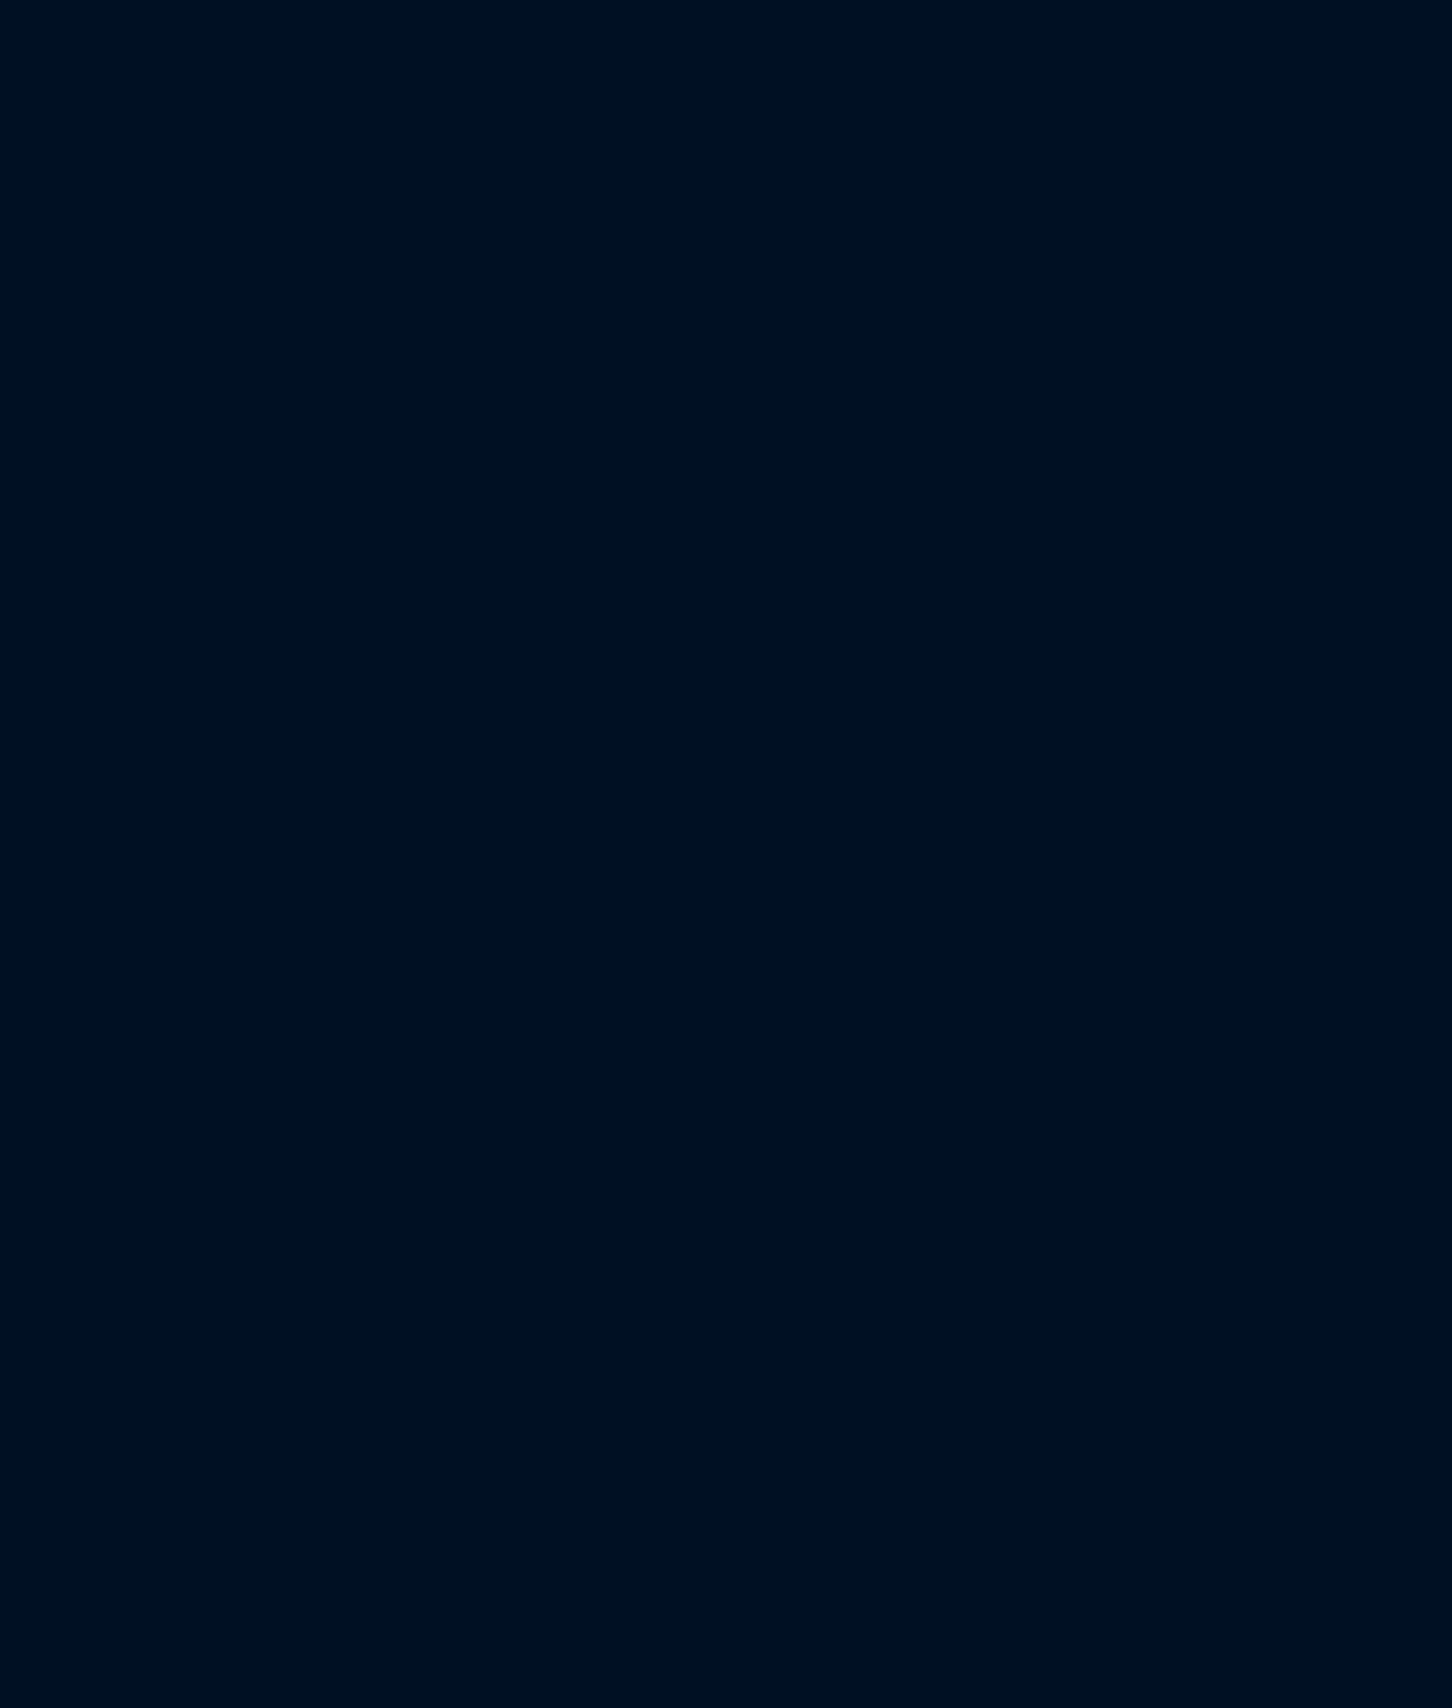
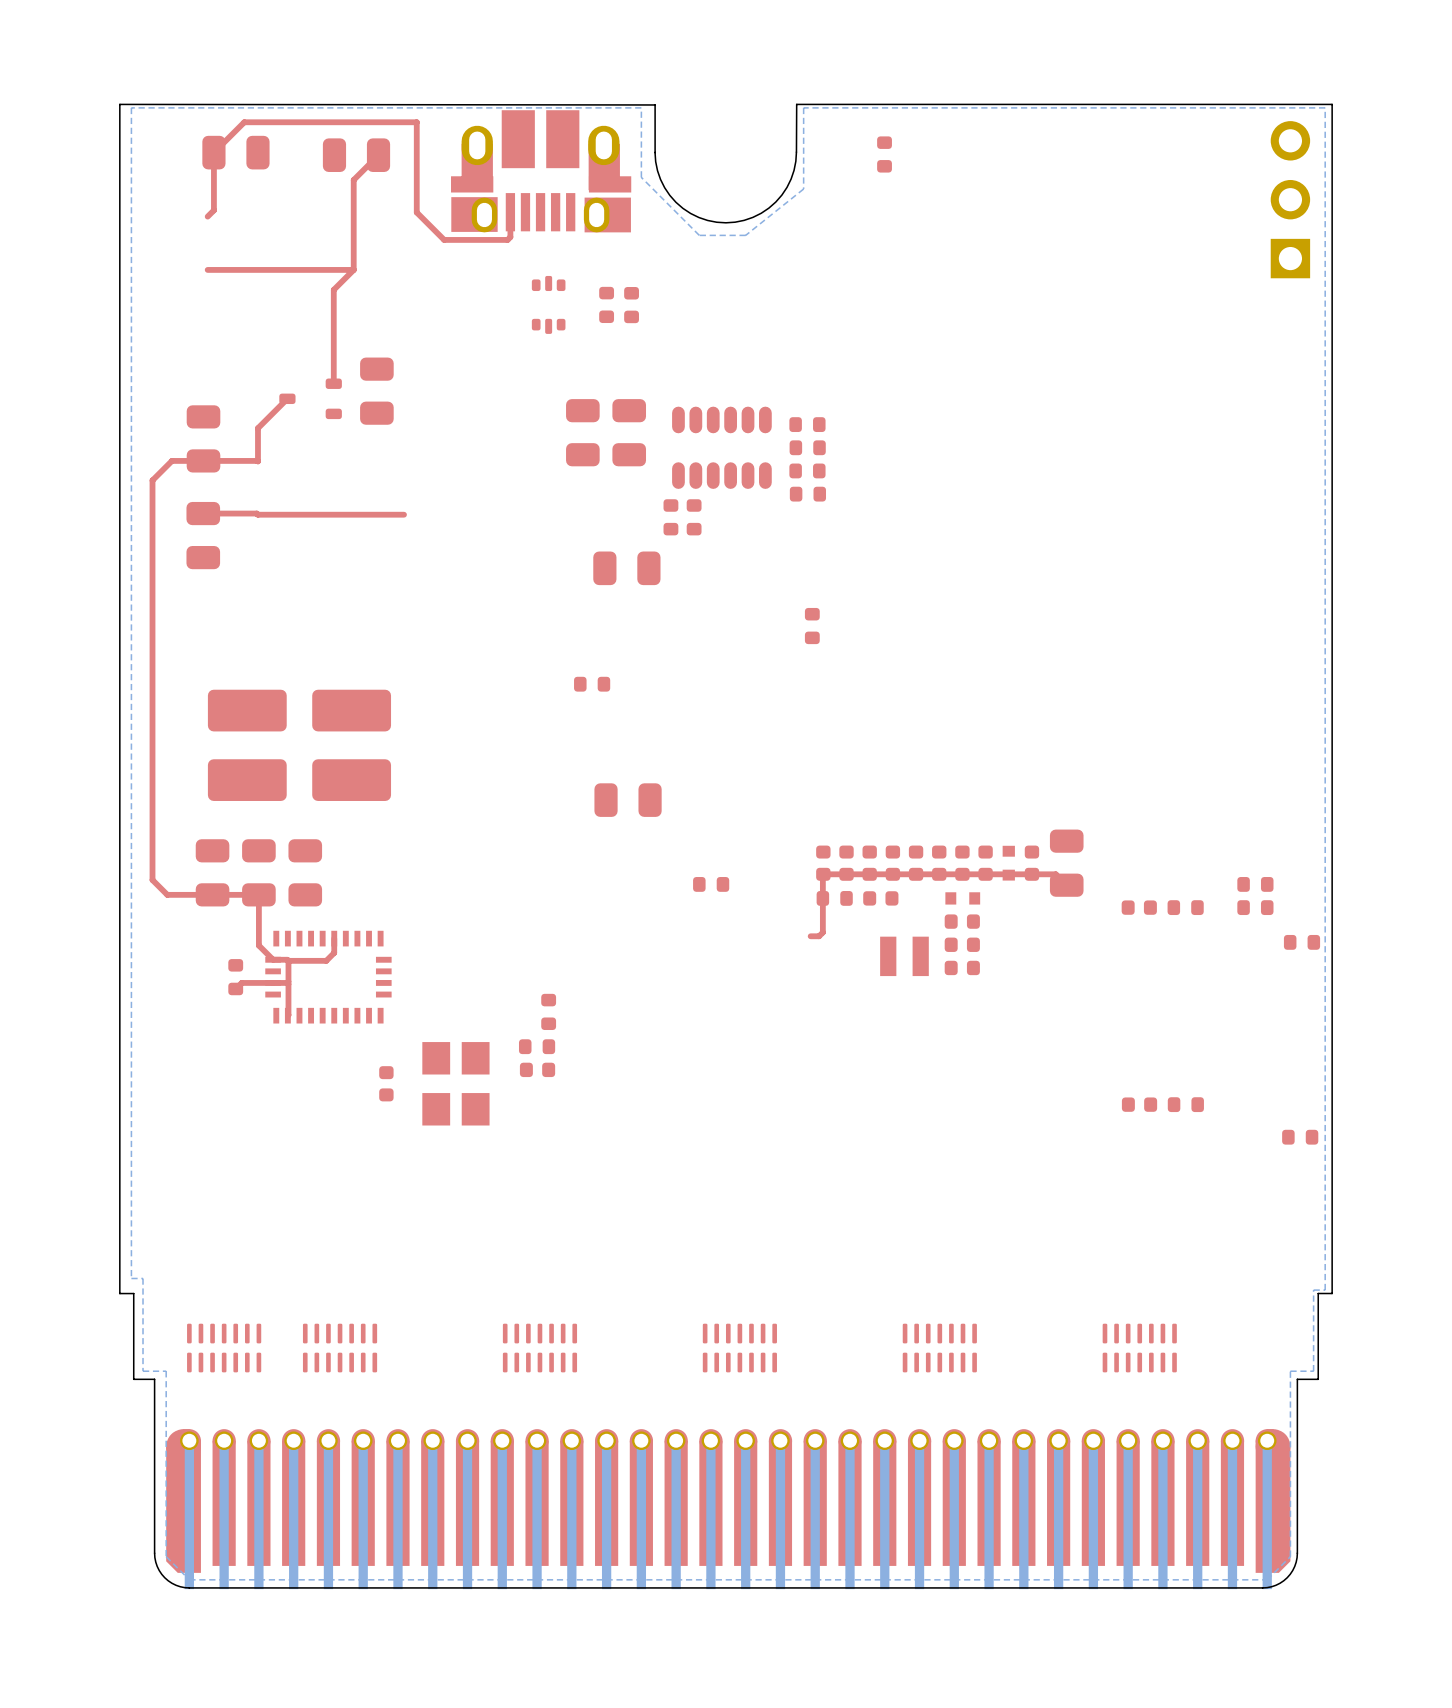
board edge: none -> (1332, 104) (796, 104) (795, 161) (787, 187) (775, 202) (761, 213) (744, 220) (725, 222) (707, 220) (690, 213) (675, 202) (664, 187) (655, 161) (655, 104) (119, 104) (119, 1293) (133, 1293) (133, 1379) (154, 1379) (154, 1557) (159, 1570) (168, 1580) (180, 1586) (189, 1587) (1262, 1587) (1279, 1583) (1290, 1574) (1294, 1566) (1297, 1553) (1297, 1379) (1318, 1379) (1318, 1293) (1332, 1293) (1332, 104)
bottom zone outline: none -> (1325, 107) (1325, 1290) (1313, 1290) (1313, 1371) (1290, 1371) (1290, 1556) (1267, 1579) (189, 1579) (166, 1556) (166, 1371) (143, 1371) (143, 1278) (131, 1278) (131, 107) (641, 107) (641, 177) (699, 235) (745, 235) (803, 189) (803, 107) (1325, 107)
part: none -> (235, 152)
part: none -> (884, 154)
part: none -> (356, 155)
top track: none -> (378, 155) (353, 179) (353, 269)
part: none -> (541, 171)
part: none -> (1290, 199)
top track: none -> (510, 212) (510, 237) (507, 239) (444, 239) (416, 212) (416, 122) (244, 122) (213, 152) (213, 210) (207, 216)
top track: none -> (353, 269) (207, 269)
top track: none -> (353, 269) (333, 289) (333, 383)
part: none -> (548, 304)
part: none -> (606, 304)
part: none -> (631, 305)
part: none -> (376, 391)
top track: none -> (287, 398) (257, 428) (257, 461) (171, 460) (152, 480) (152, 880) (167, 894) (258, 894) (258, 945) (273, 959) (288, 960)
part: none -> (310, 398)
part: none -> (807, 424)
part: none -> (582, 432)
part: none -> (629, 432)
part: none -> (203, 438)
part: none -> (721, 447)
part: none -> (807, 447)
part: none -> (807, 470)
part: none -> (807, 494)
top track: none -> (203, 513) (404, 514)
part: none -> (670, 517)
part: none -> (694, 517)
part: none -> (203, 535)
part: none -> (626, 568)
part: none -> (812, 626)
part: none -> (592, 684)
part: none -> (247, 710)
part: none -> (351, 710)
part: none -> (247, 780)
part: none -> (351, 780)
part: none -> (628, 800)
part: none -> (823, 863)
part: none -> (846, 863)
part: none -> (869, 863)
part: none -> (892, 863)
part: none -> (916, 863)
part: none -> (939, 863)
part: none -> (962, 863)
part: none -> (985, 863)
part: none -> (1008, 863)
part: none -> (1031, 863)
part: none -> (1066, 863)
part: none -> (212, 872)
part: none -> (258, 872)
part: none -> (305, 872)
part: none -> (711, 884)
part: none -> (1255, 884)
top track: none -> (1066, 885) (1055, 874) (823, 874) (822, 932) (819, 936) (810, 936)
part: none -> (834, 898)
part: none -> (880, 898)
part: none -> (962, 898)
part: none -> (1139, 907)
part: none -> (1185, 907)
part: none -> (1255, 907)
part: none -> (962, 921)
top track: none -> (334, 938) (334, 952) (326, 960) (288, 960)
part: none -> (1302, 942)
part: none -> (962, 944)
part: none -> (904, 956)
top track: none -> (288, 960) (287, 982)
part: none -> (962, 967)
part: none -> (235, 977)
part: none -> (328, 977)
top track: none -> (287, 982) (241, 982) (235, 988)
top track: none -> (287, 982) (287, 1015)
part: none -> (548, 1011)
part: none -> (537, 1046)
part: none -> (537, 1069)
part: none -> (386, 1083)
part: none -> (455, 1083)
part: none -> (1139, 1104)
part: none -> (1185, 1104)
part: none -> (1300, 1137)
part: none -> (224, 1348)
part: none -> (340, 1348)
part: none -> (539, 1348)
part: none -> (739, 1348)
part: none -> (939, 1348)
part: none -> (1139, 1348)
part: none -> (728, 1509)

